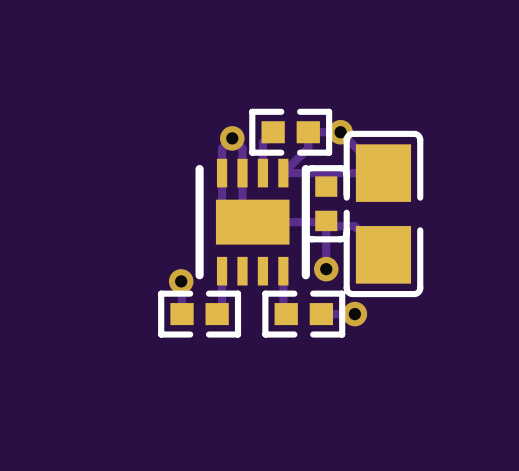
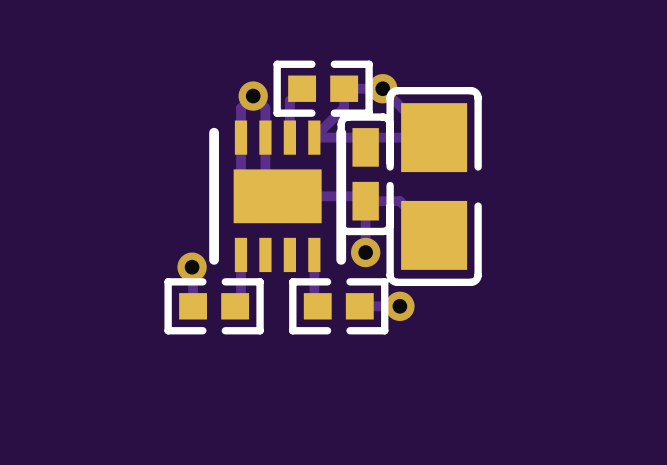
part footprint: [302, 165, 350, 243] -> [337, 113, 394, 236]

